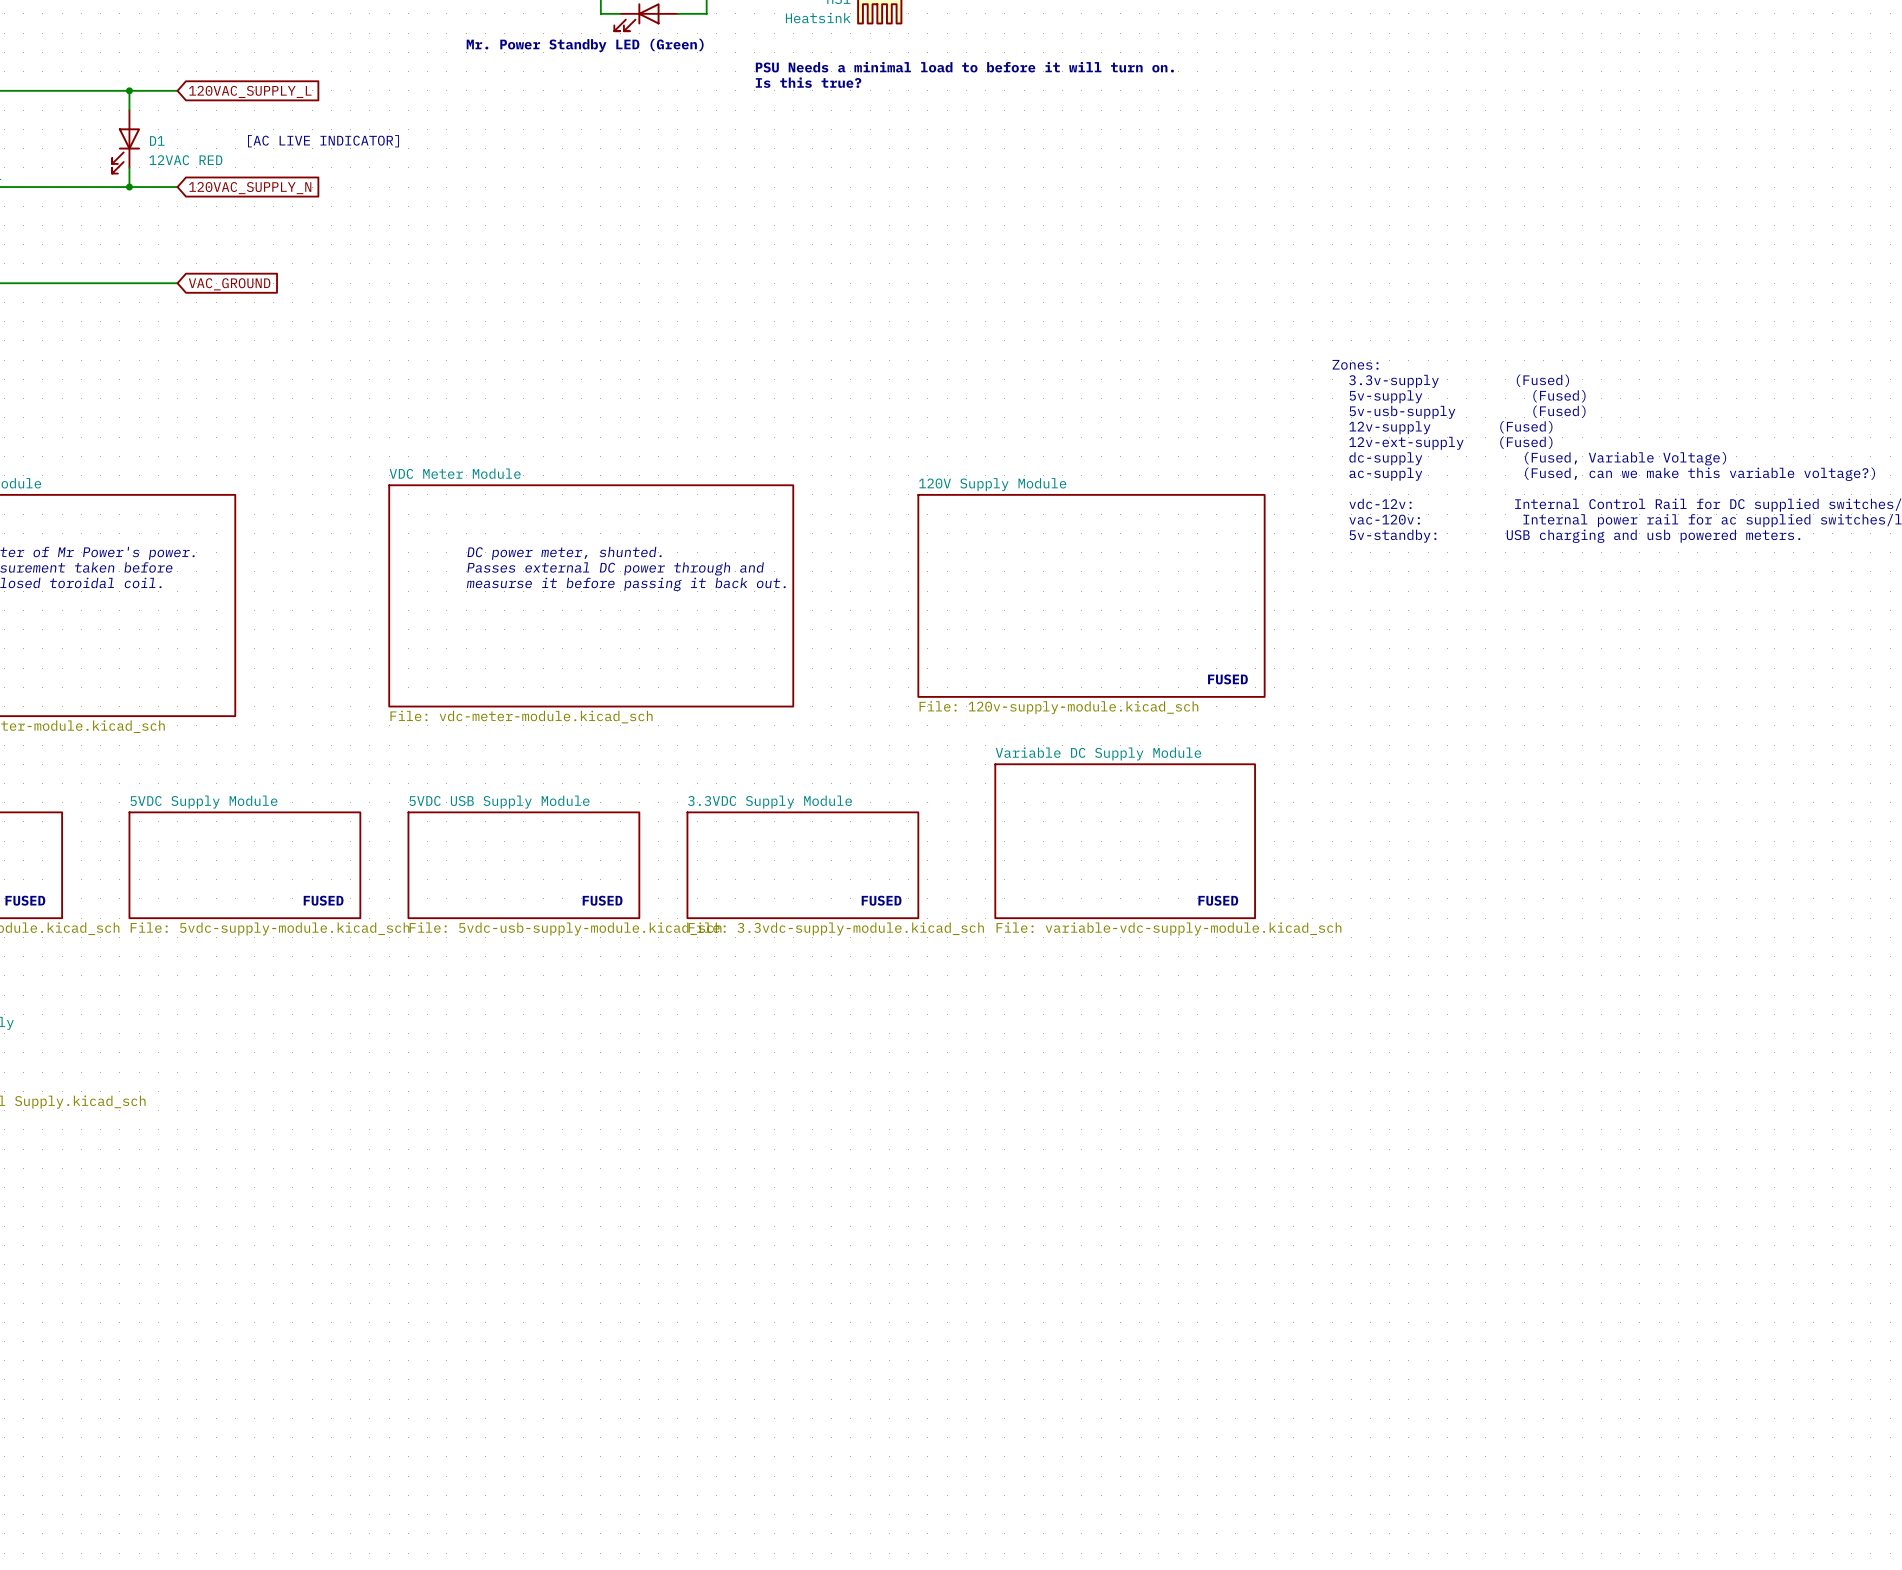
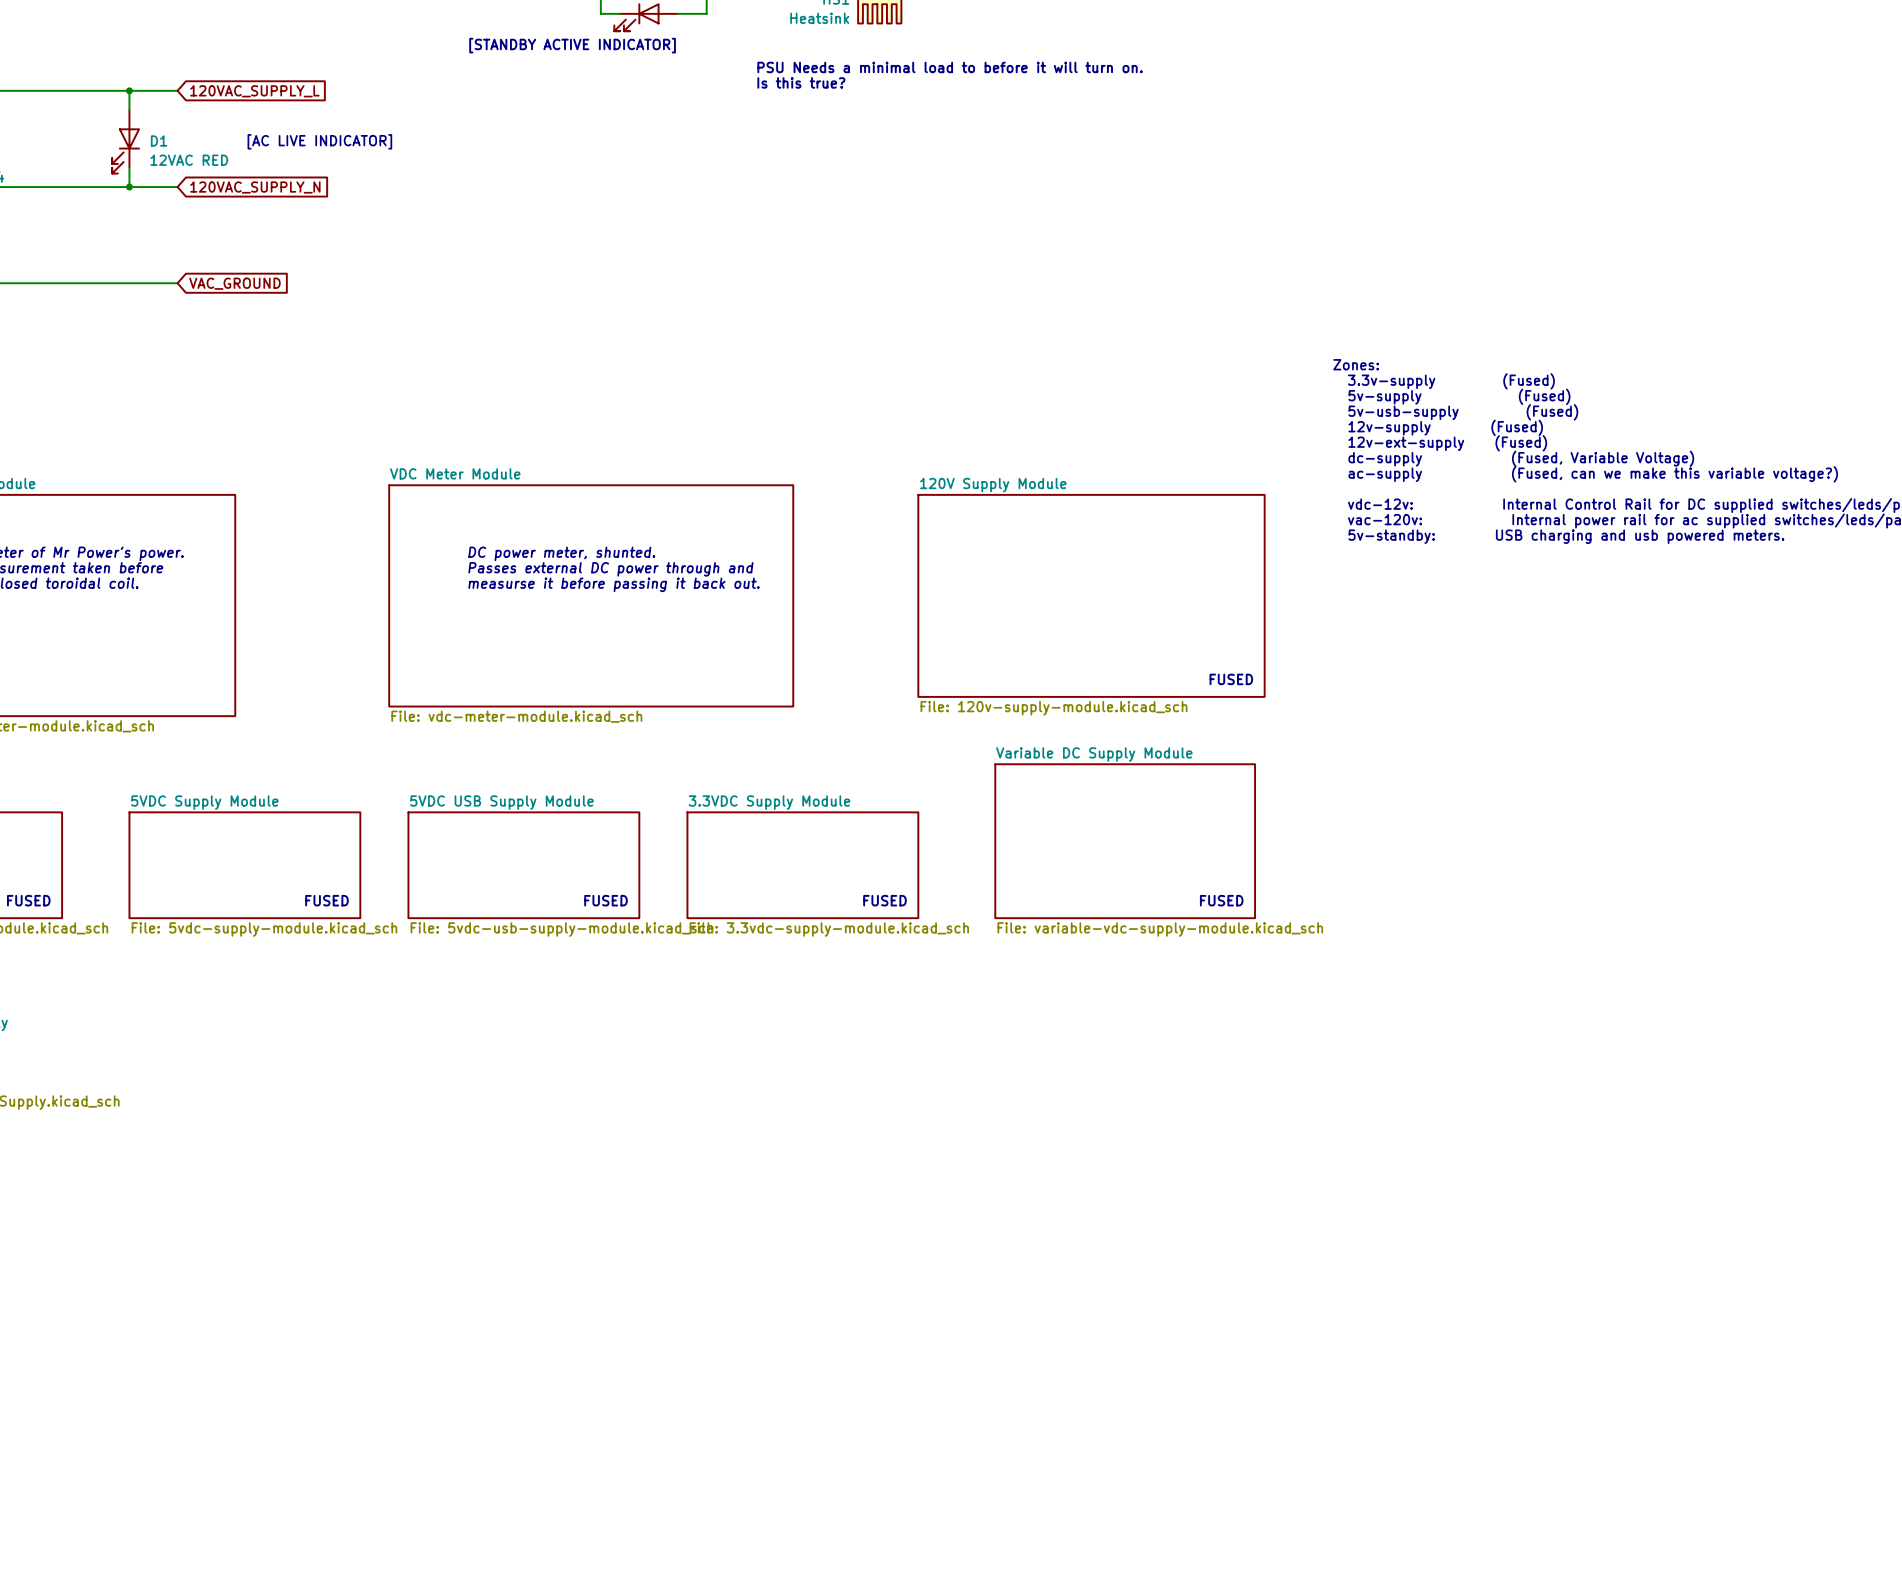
text: Mr. Power Standby LED (Green) (585, 45) -> [STANDBY ACTIVE INDICATOR] (572, 45)

